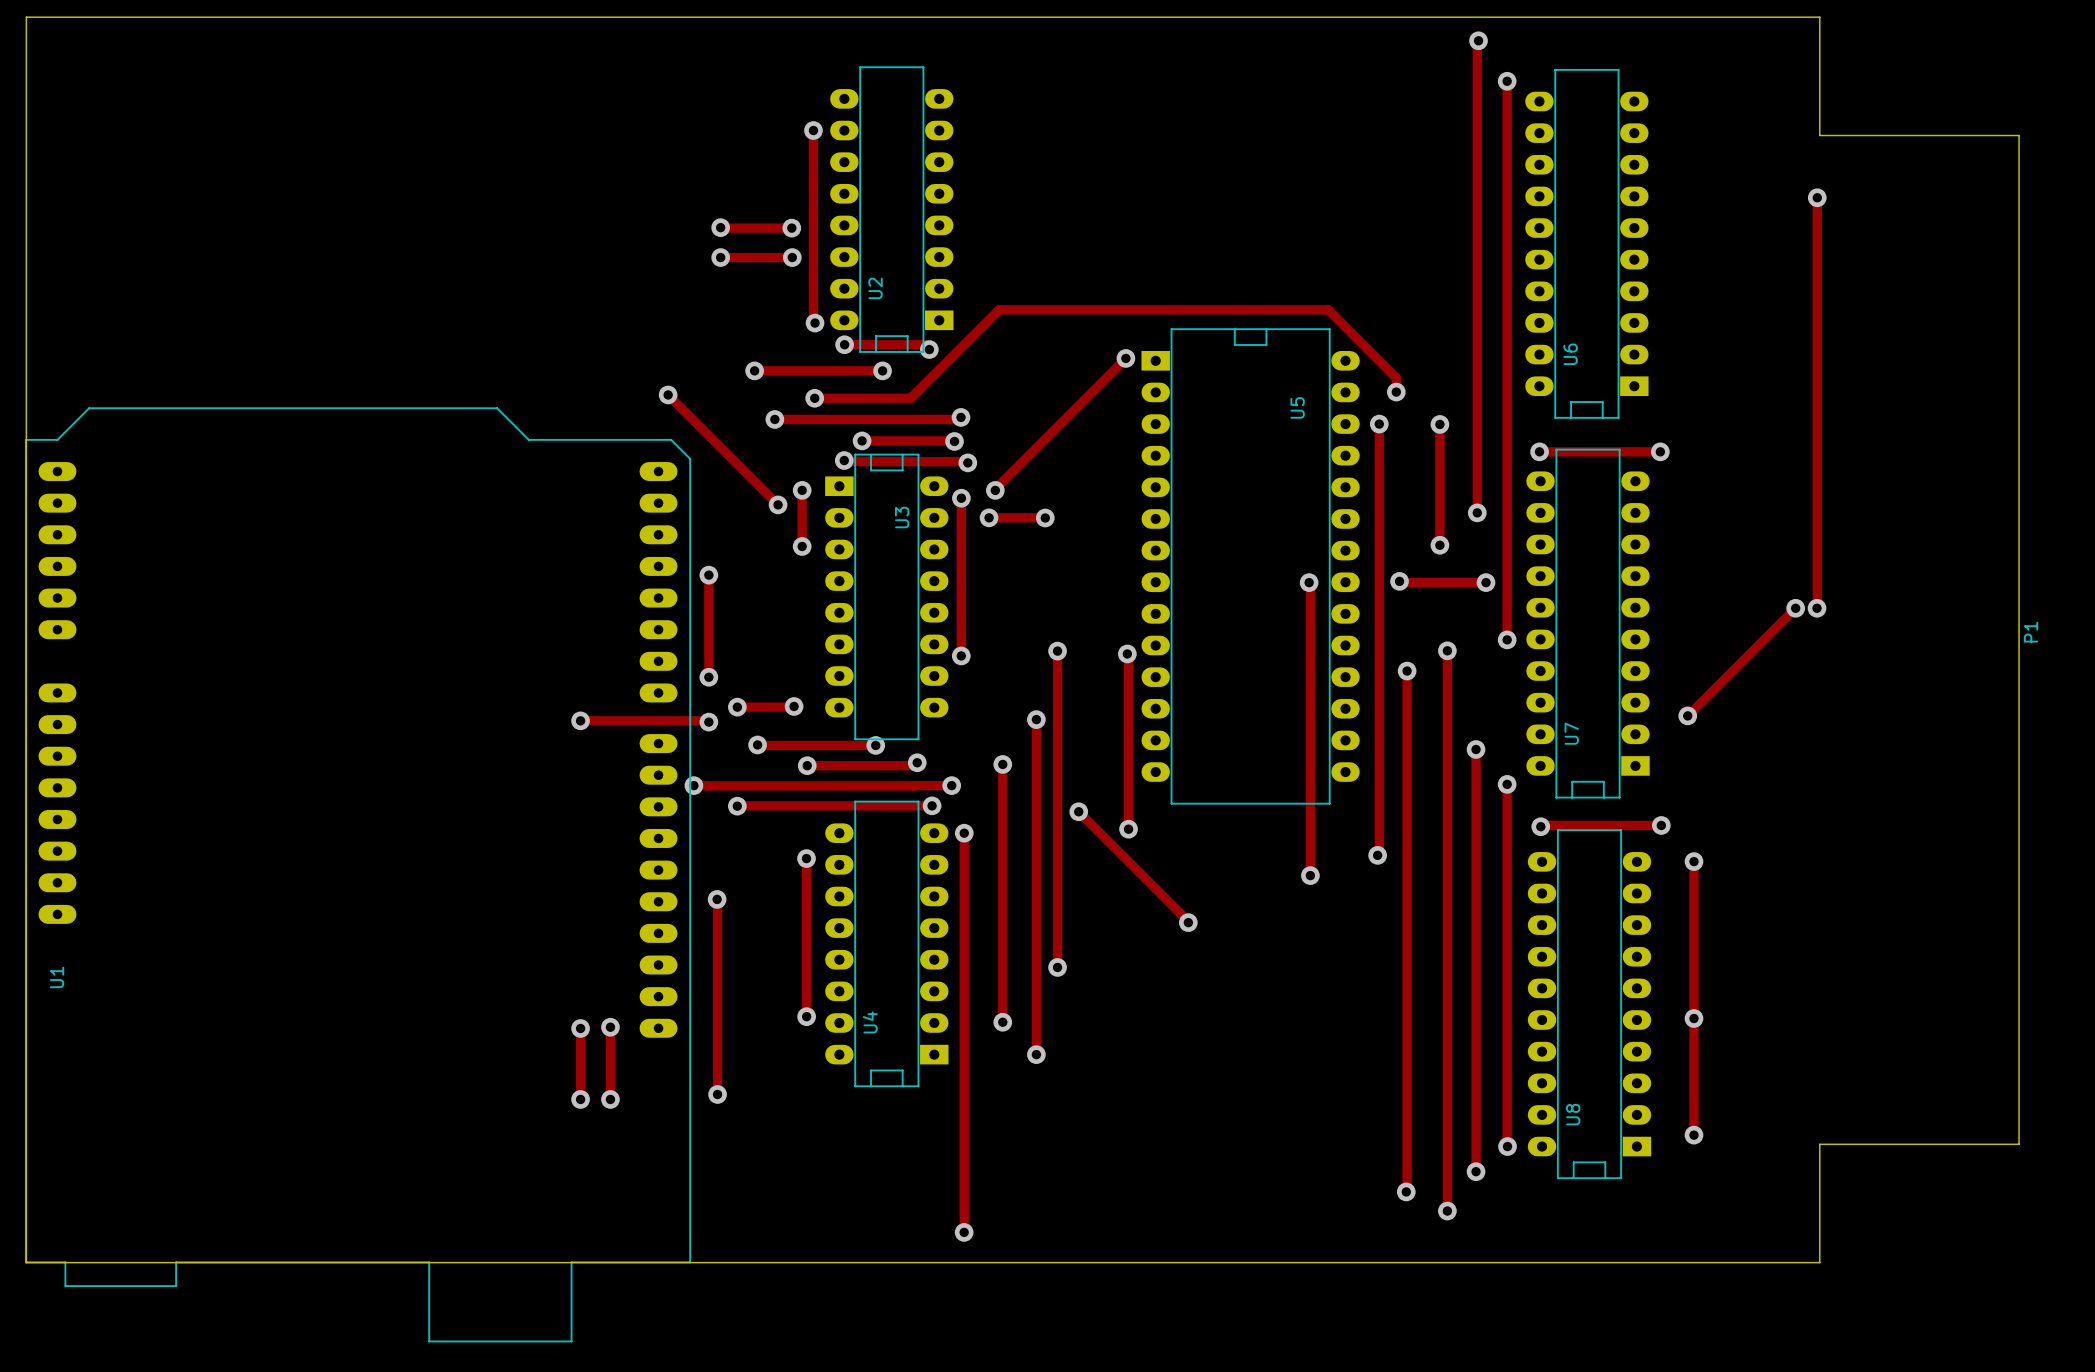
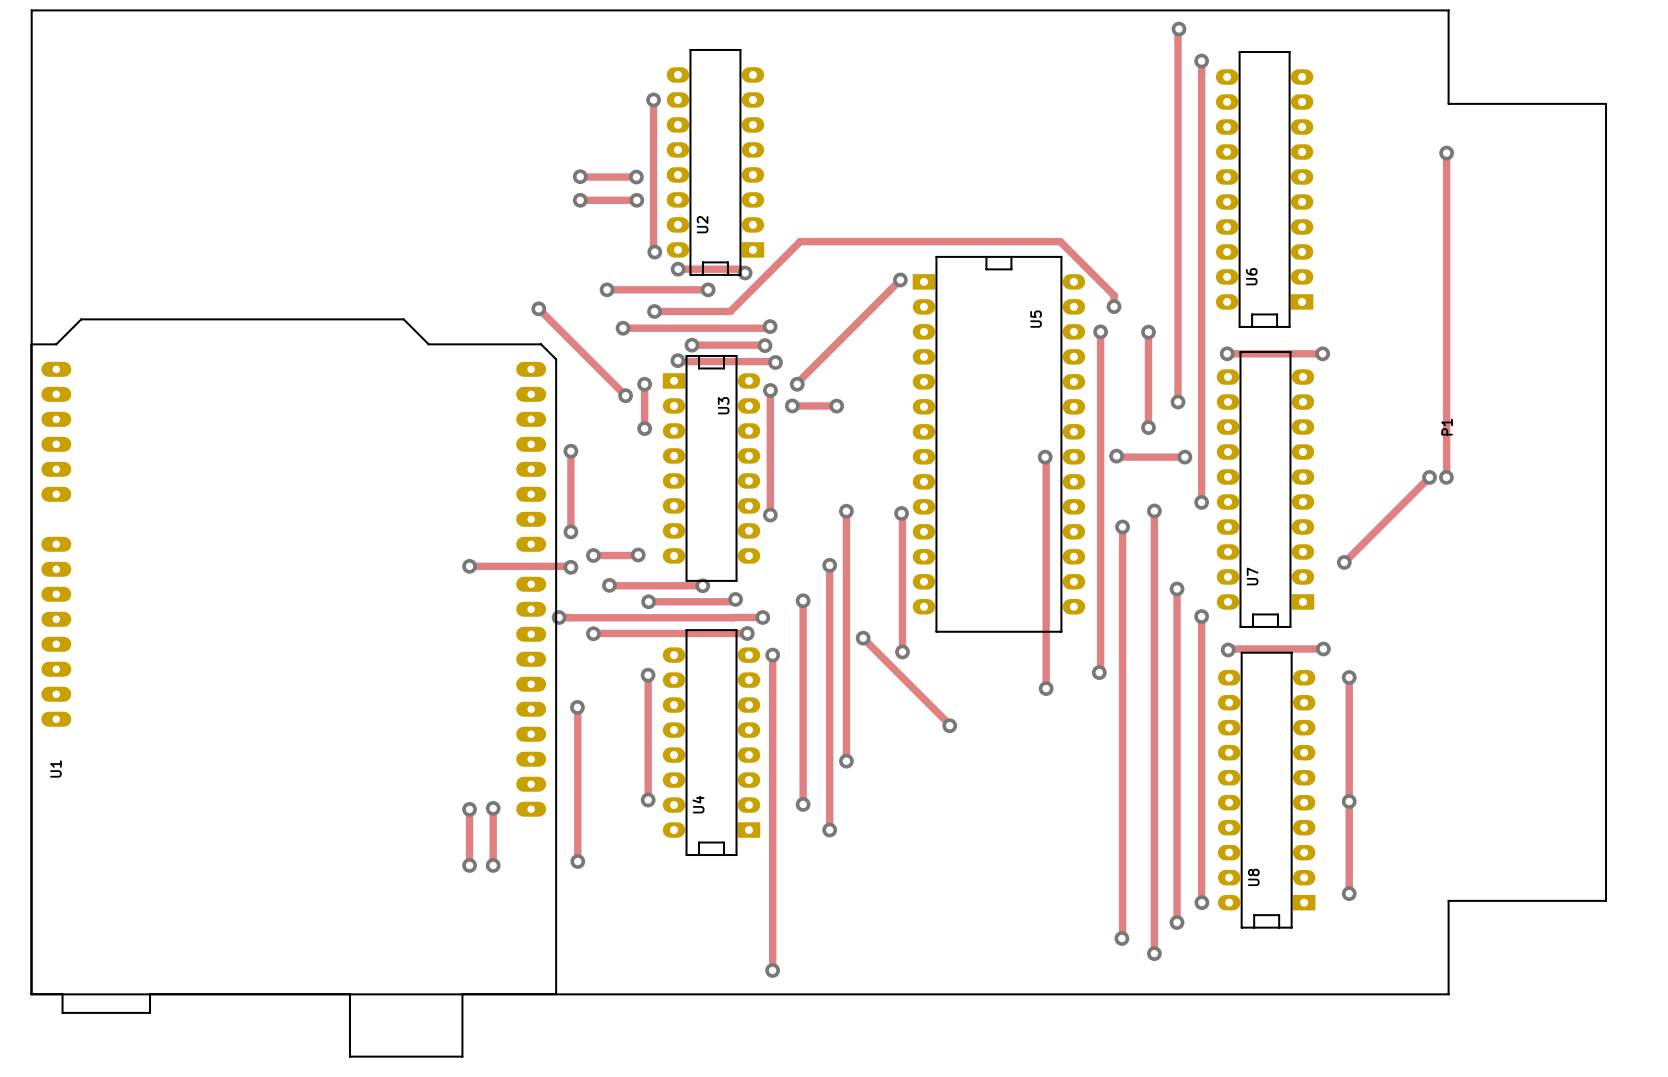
P1 position: (2031, 632) -> (1447, 427)

